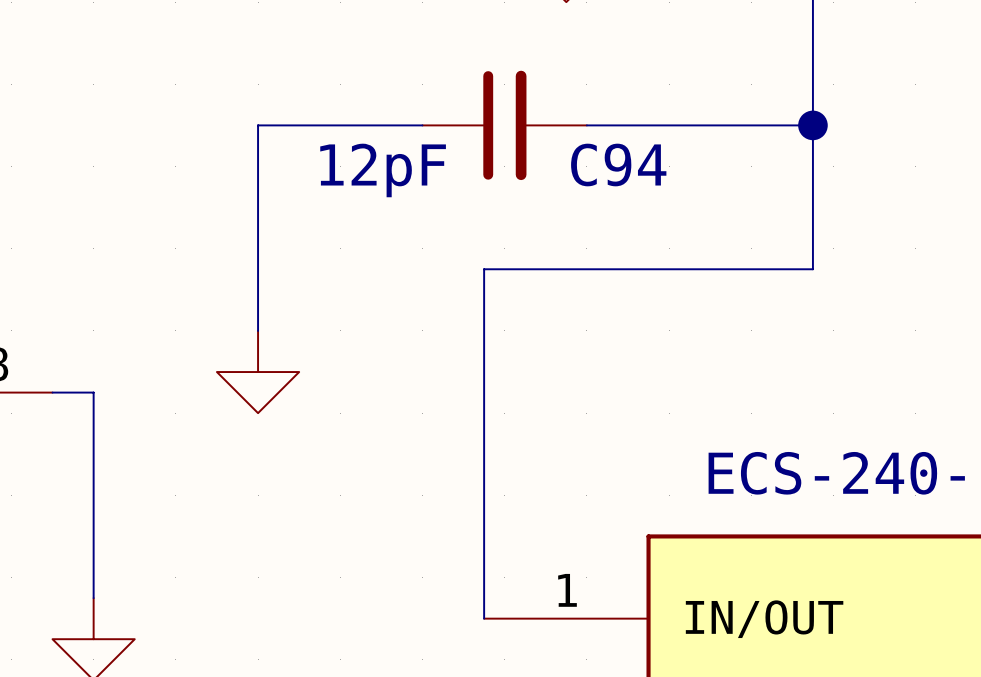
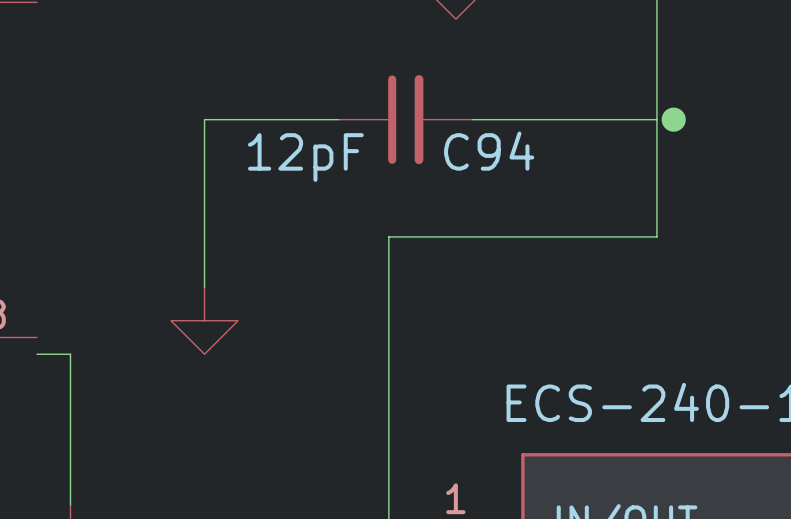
junction position: (812, 125) -> (673, 119)
wire: (52, 392) (93, 392) (93, 413) -> (36, 354) (70, 354)

